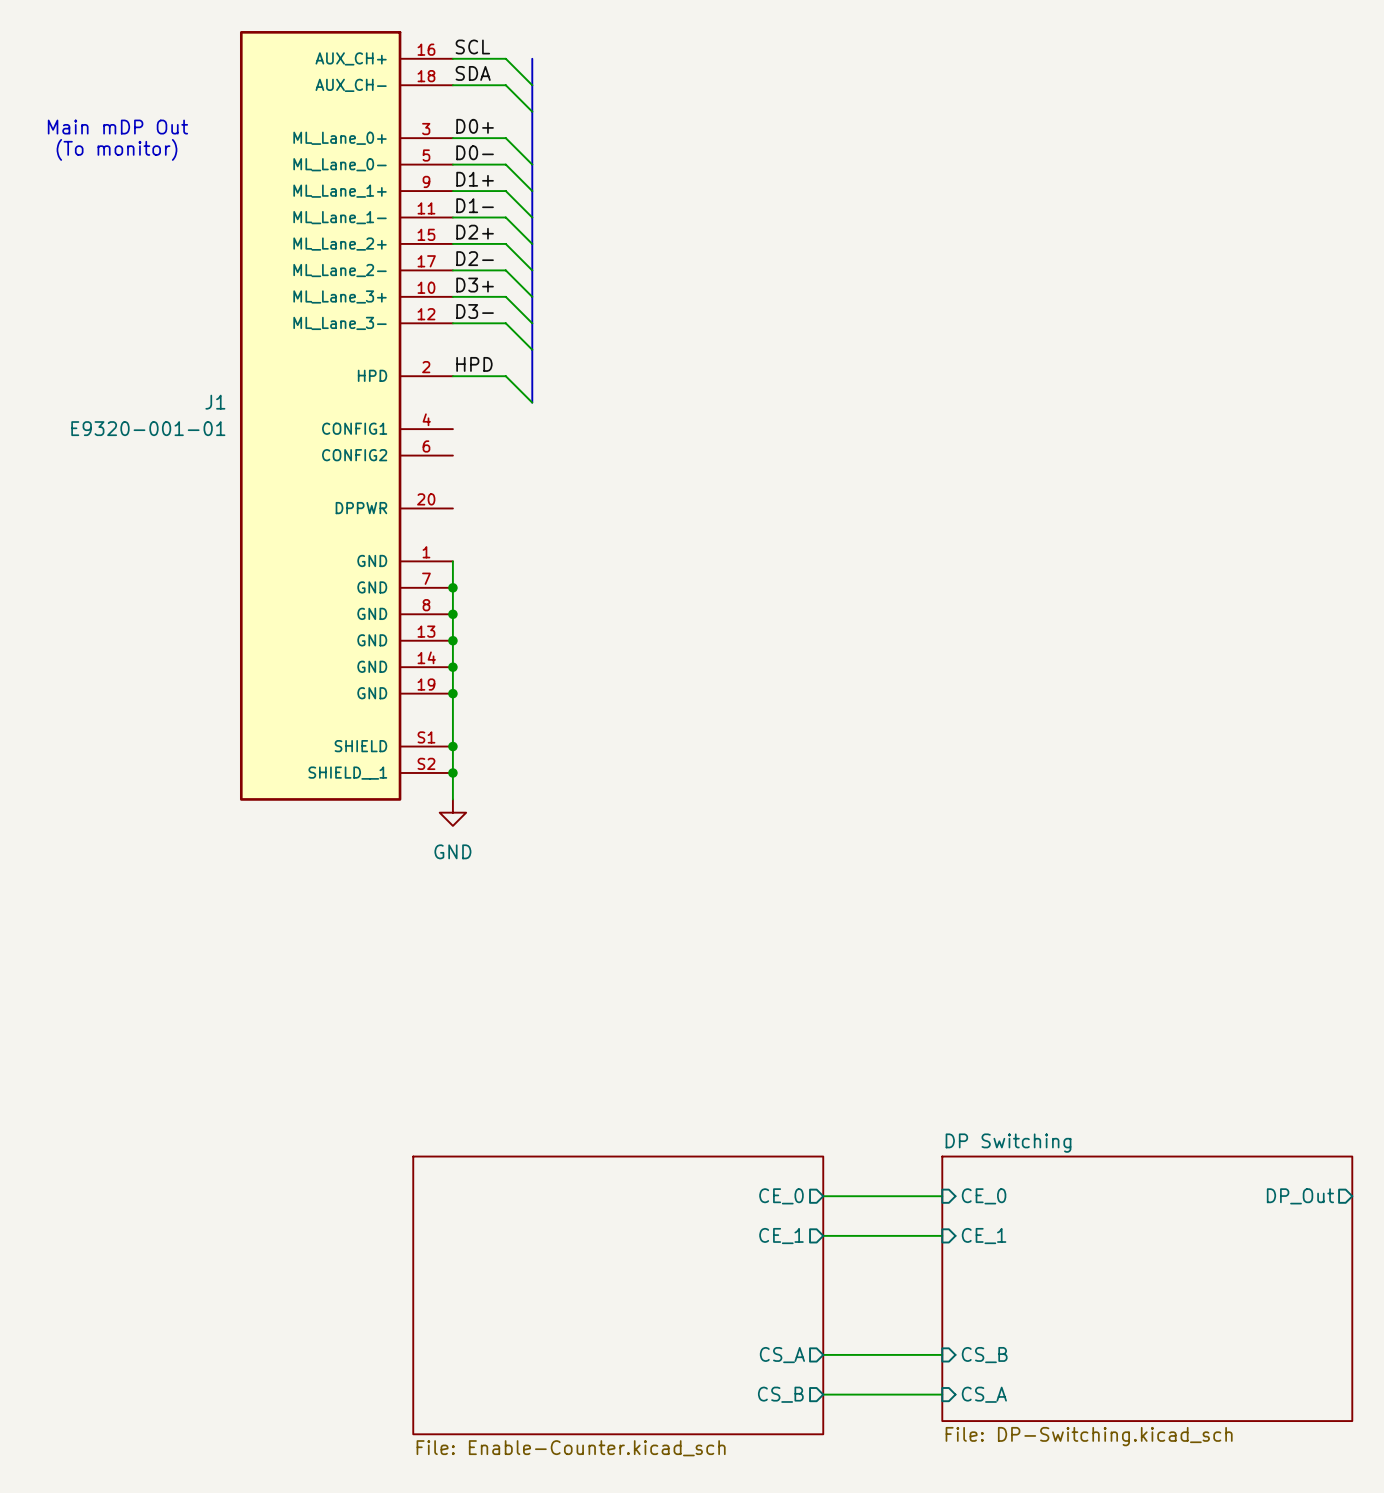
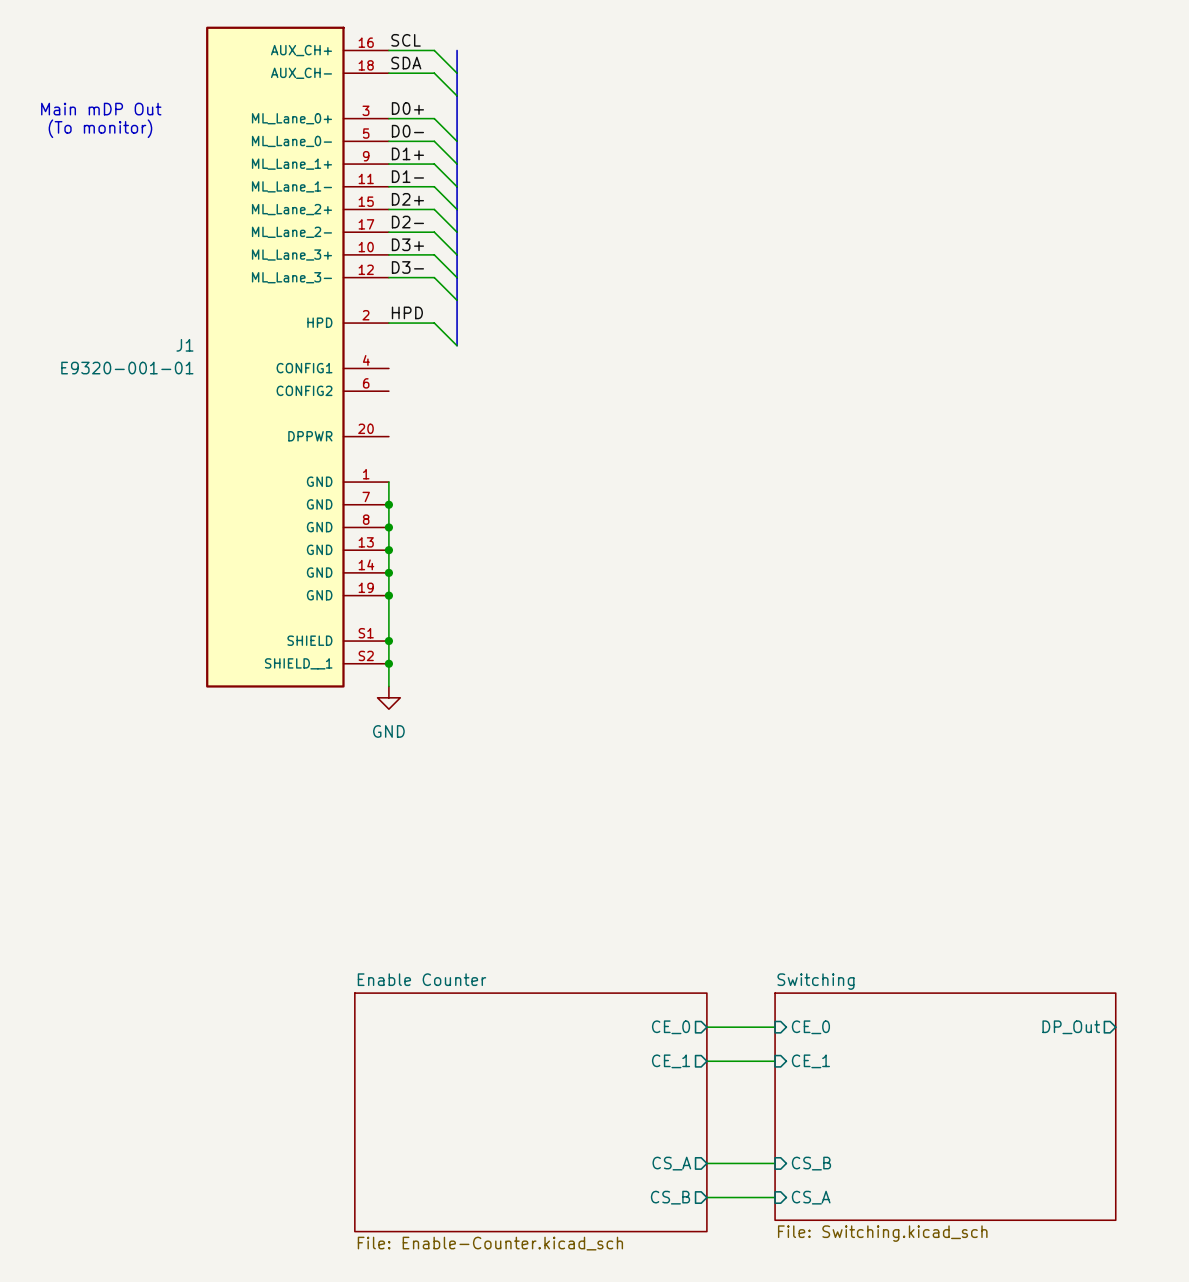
sheet Enable Counter name: none -> Enable Counter (421, 979)
wire: (902, 1196) (942, 1196) -> none
sheet pin position: CE_0 (984, 1196) -> CE_0 (810, 1027)
sheet pin position: DP_Out (1300, 1196) -> DP_Out (1071, 1027)
wire: (902, 1235) (942, 1235) -> none
sheet pin position: CE_1 (984, 1236) -> CE_1 (810, 1061)
sheet Switching: none -> File: Switching.kicad_sch (945, 1106)
sheet DP Switching: File: DP-Switching.kicad_sch (1147, 1288) -> none
wire: (902, 1354) (942, 1354) -> none
sheet pin position: CS_B (984, 1355) -> CS_B (811, 1163)
wire: (902, 1394) (942, 1394) -> none
sheet pin position: CS_A (984, 1394) -> CS_A (811, 1197)

